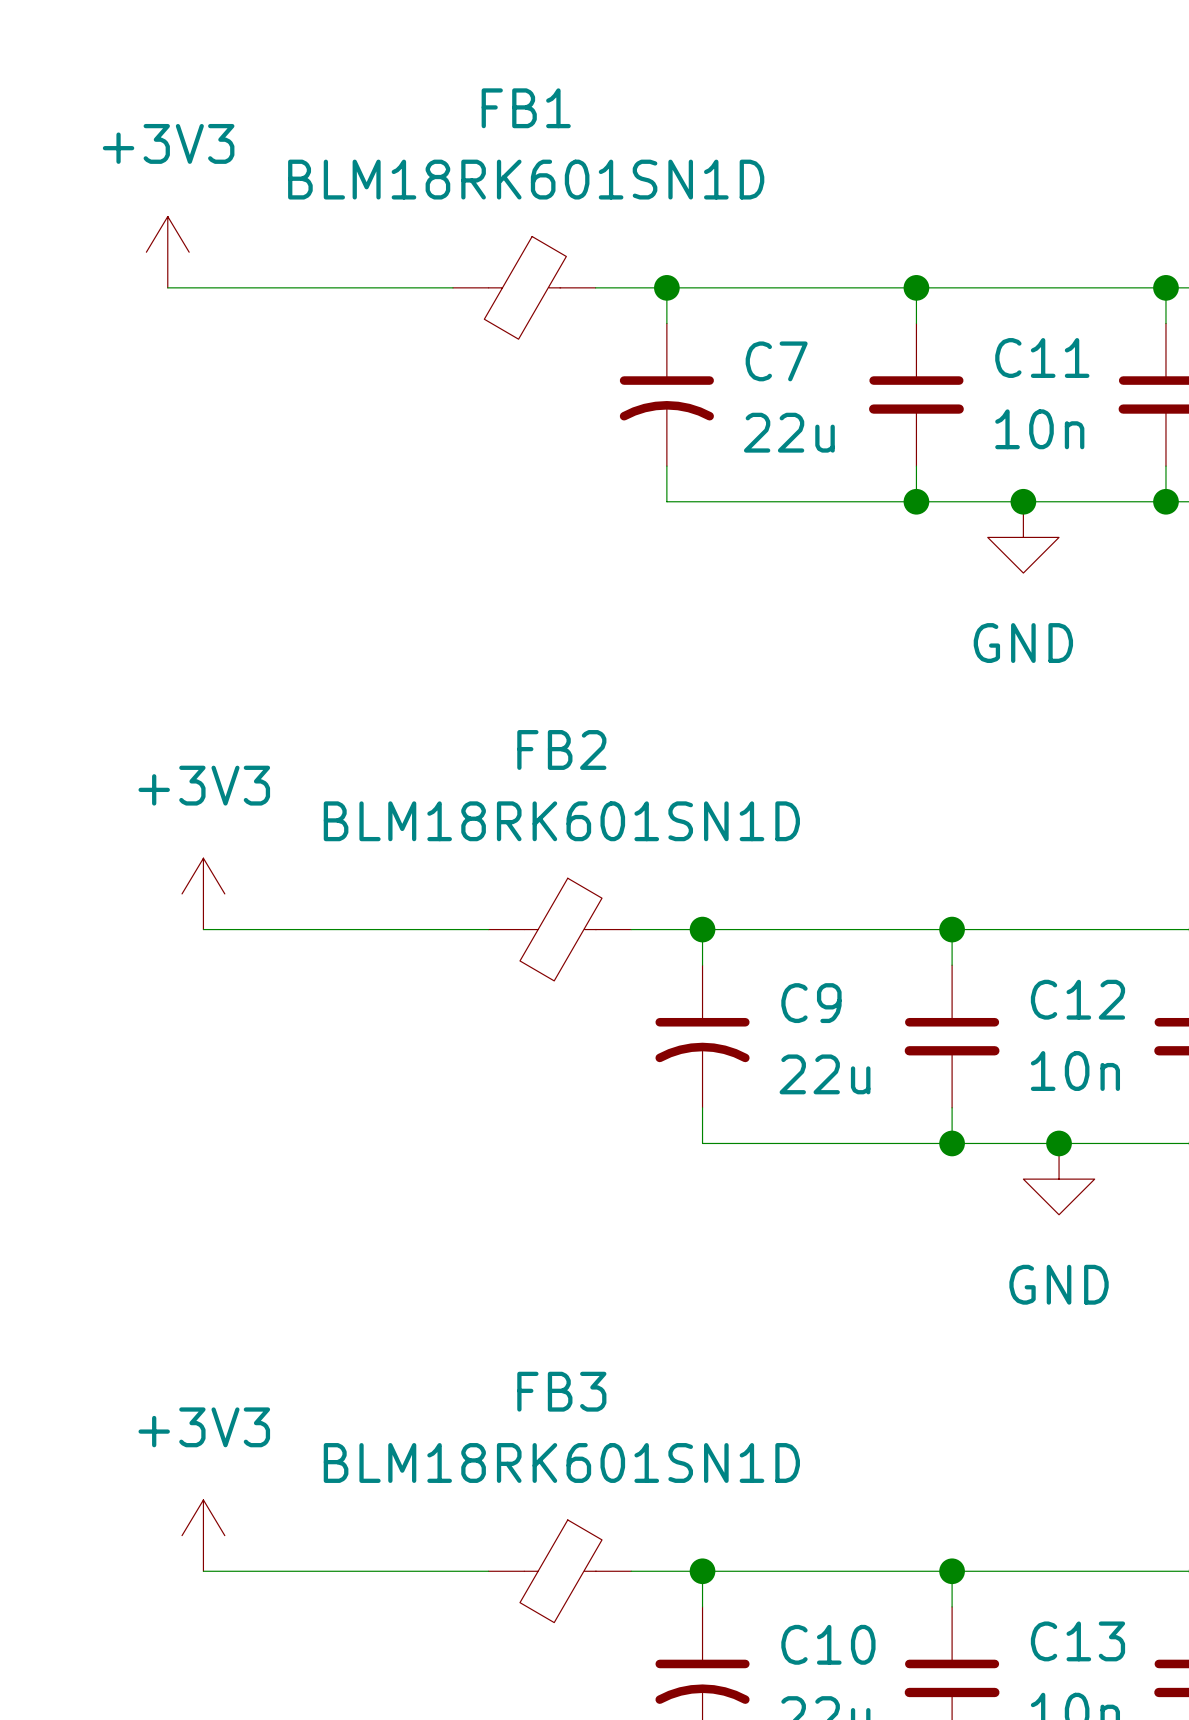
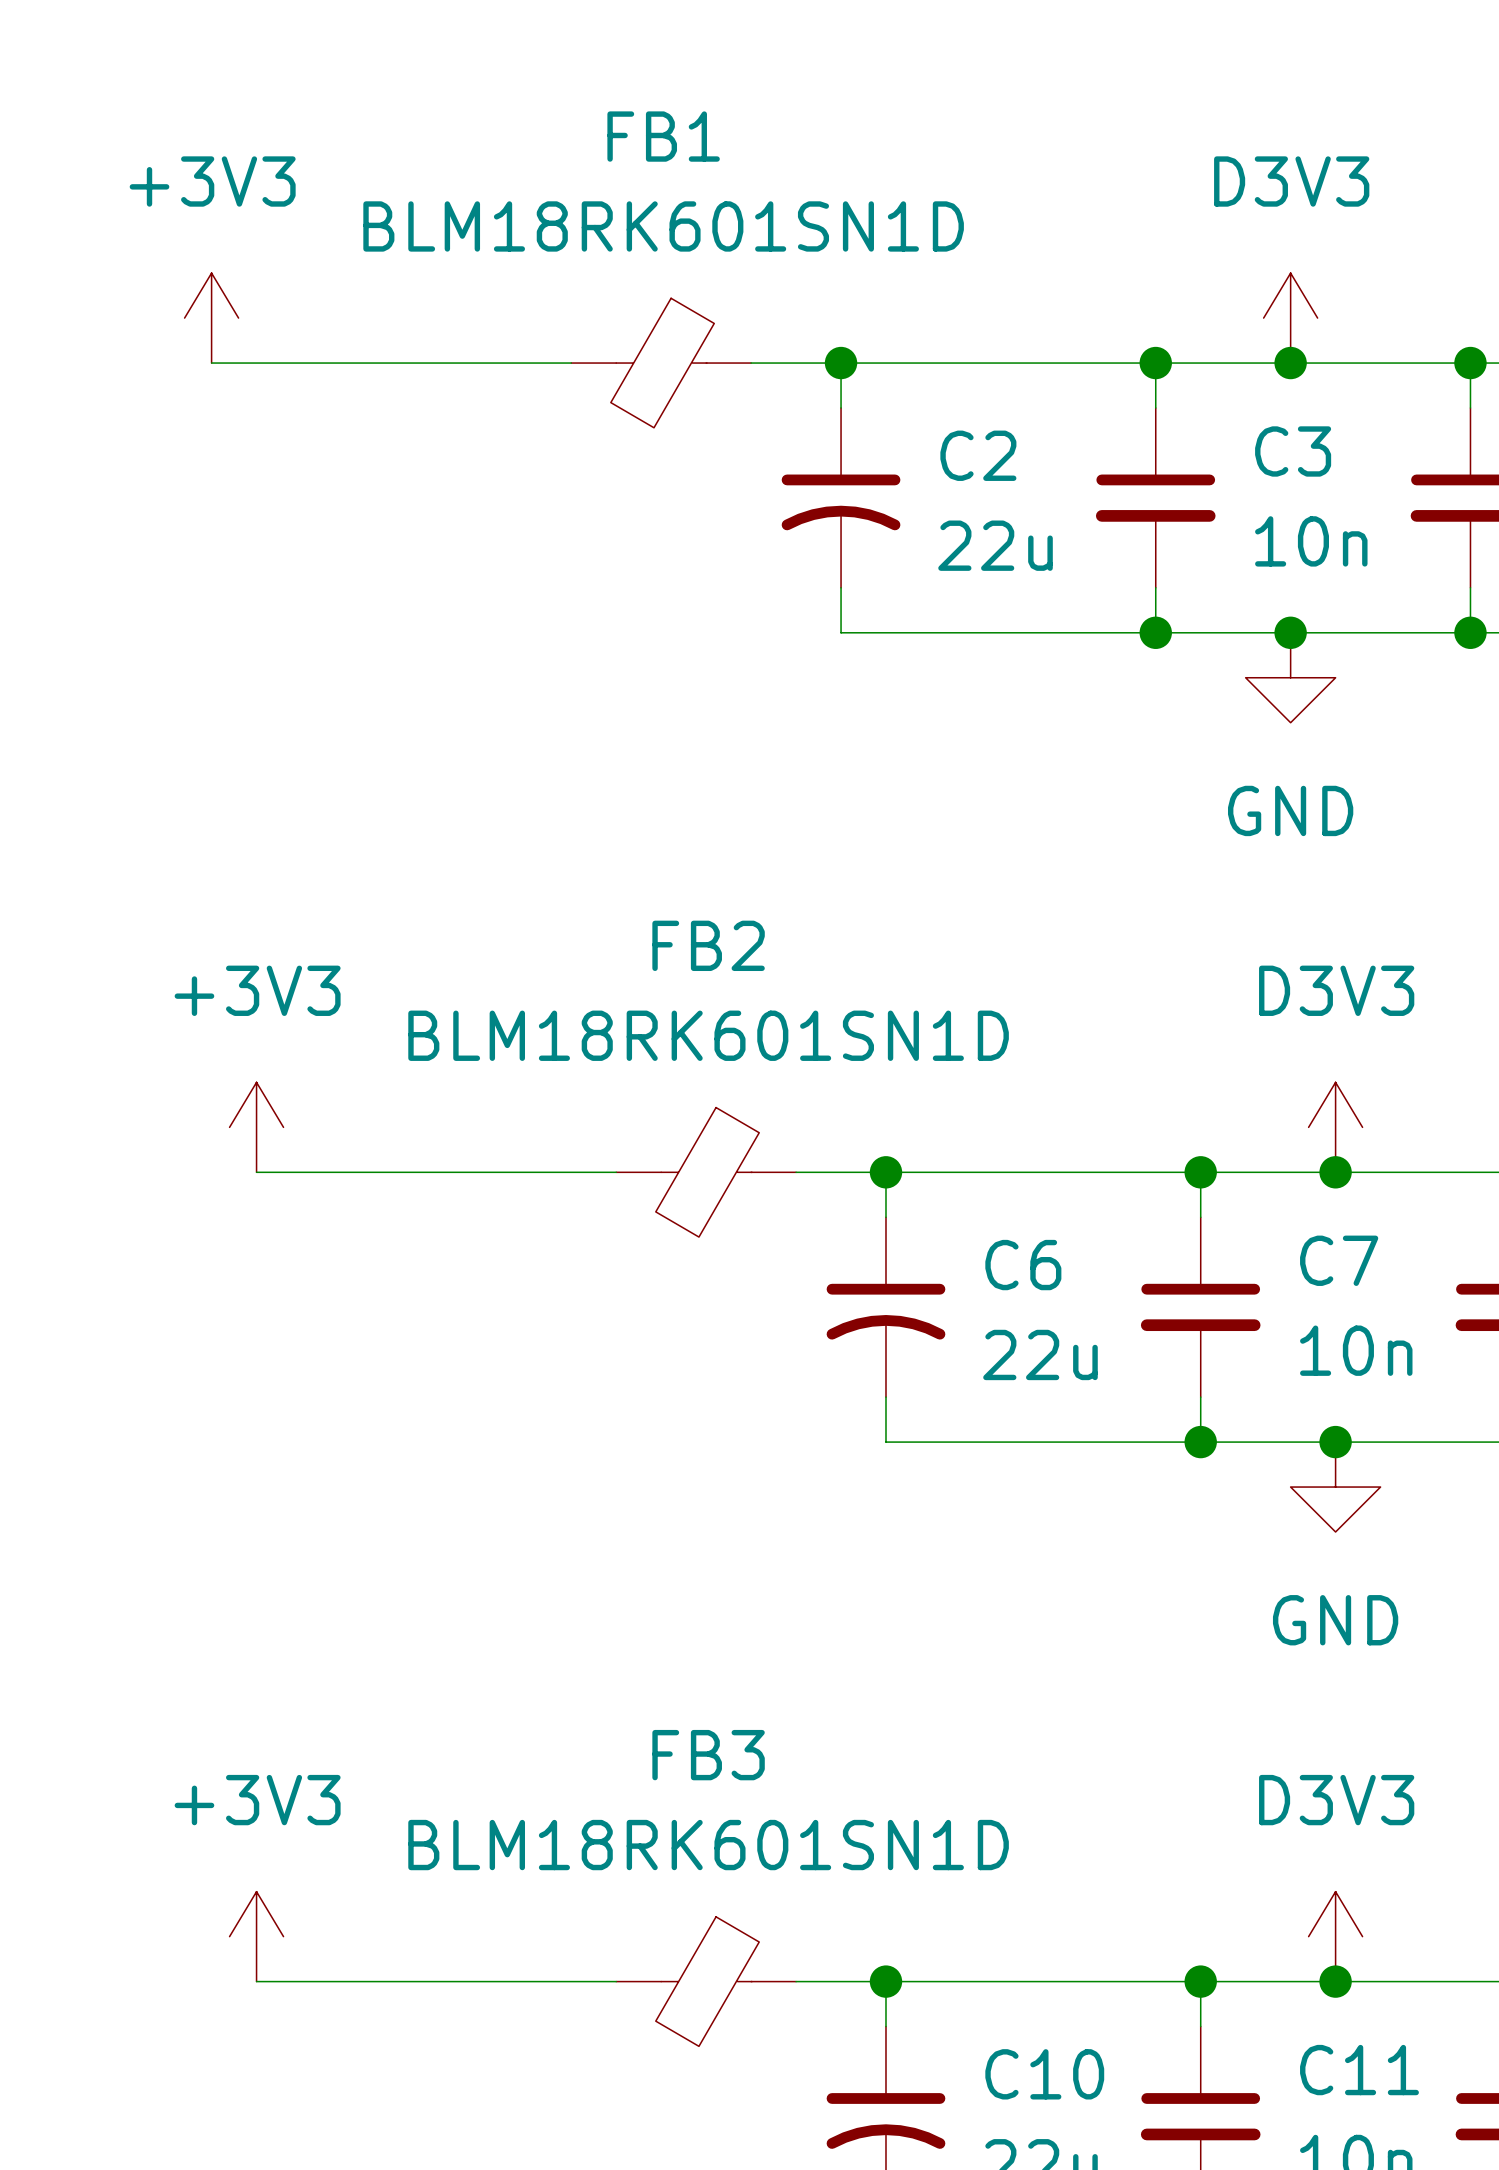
power symbol: none -> D3V3 (1290, 318)
junction: none -> (1290, 363)
C11 name: C11 (1042, 358) -> C3 (1293, 451)
C7 name: C7 (776, 361) -> C2 (978, 455)
power symbol: none -> D3V3 (1335, 1127)
junction: none -> (1335, 1172)
C12 name: C12 (1077, 999) -> C7 (1339, 1260)
C9 name: C9 (811, 1003) -> C6 (1023, 1265)
power symbol: none -> D3V3 (1335, 1936)
junction: none -> (1335, 1981)
C13 name: C13 (1077, 1641) -> C11 (1359, 2070)

